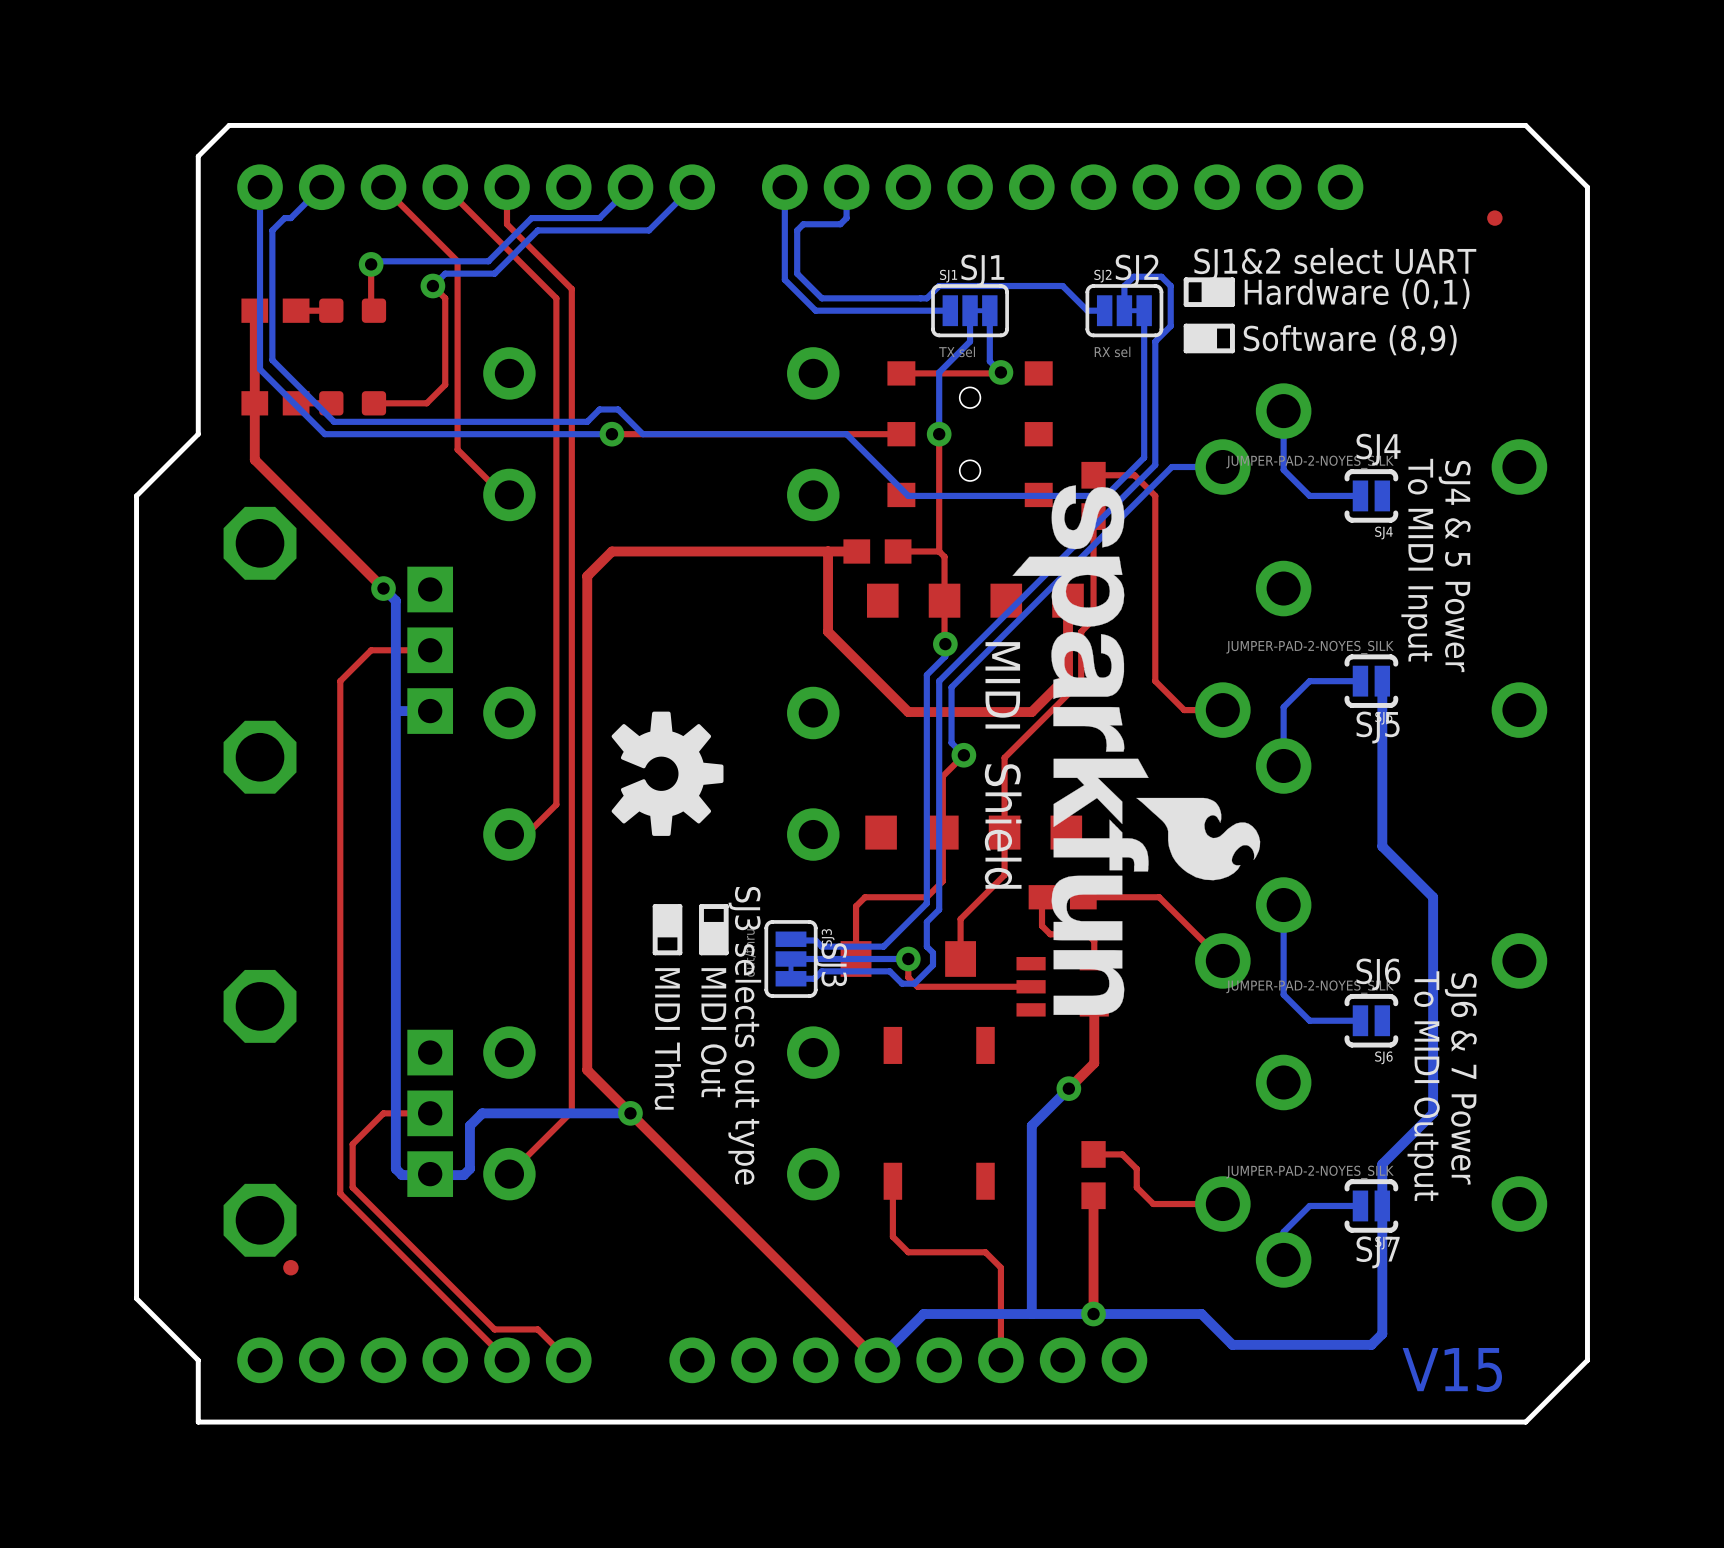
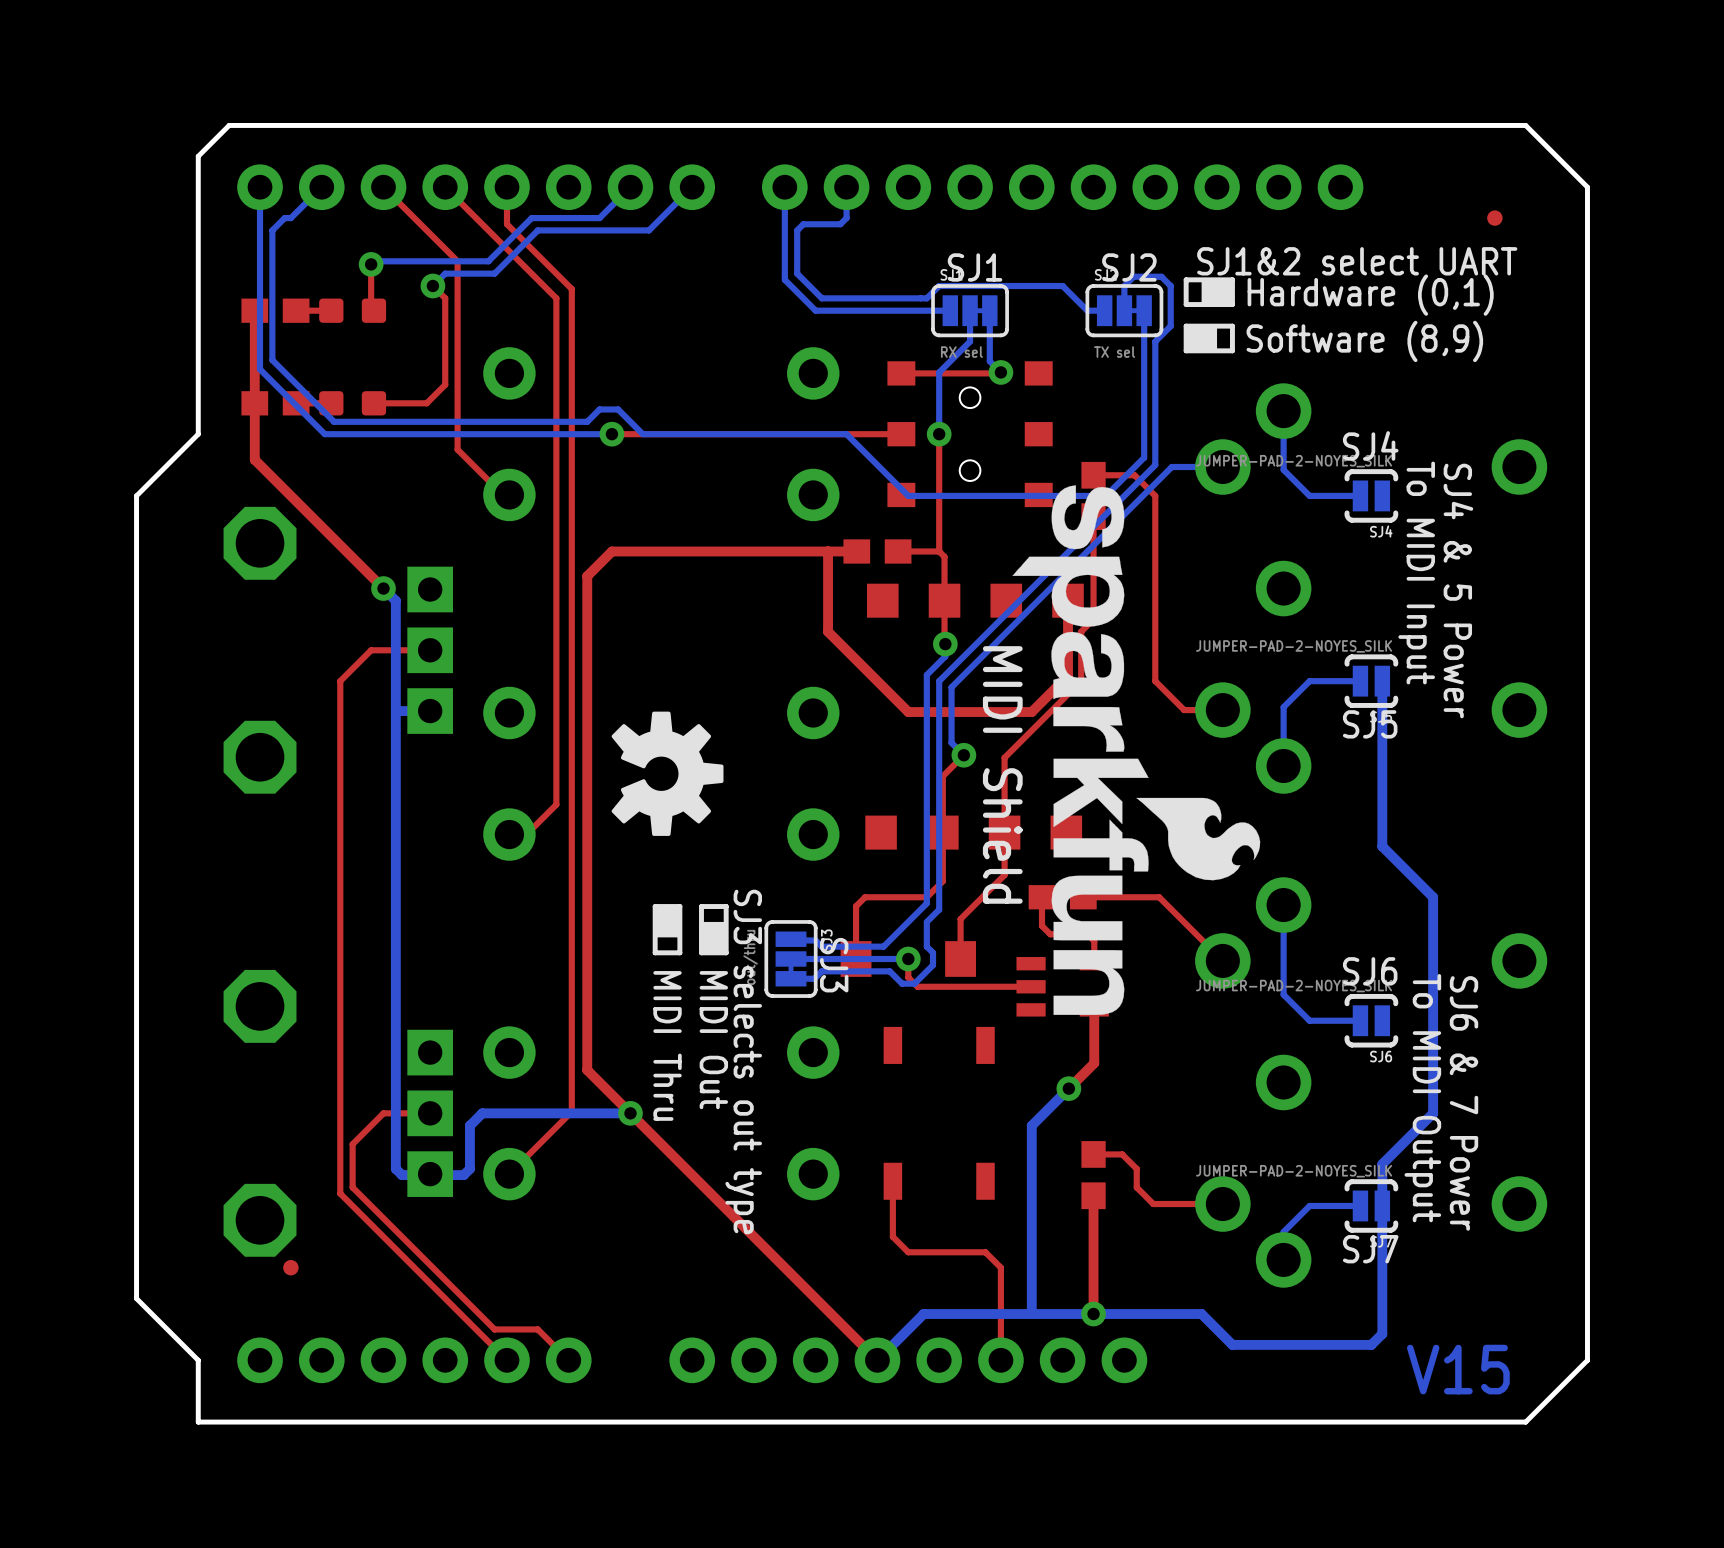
SJ1 value: TX sel (957, 351) -> RX sel (961, 352)
SJ2 value: RX sel (1112, 351) -> TX sel (1114, 352)

